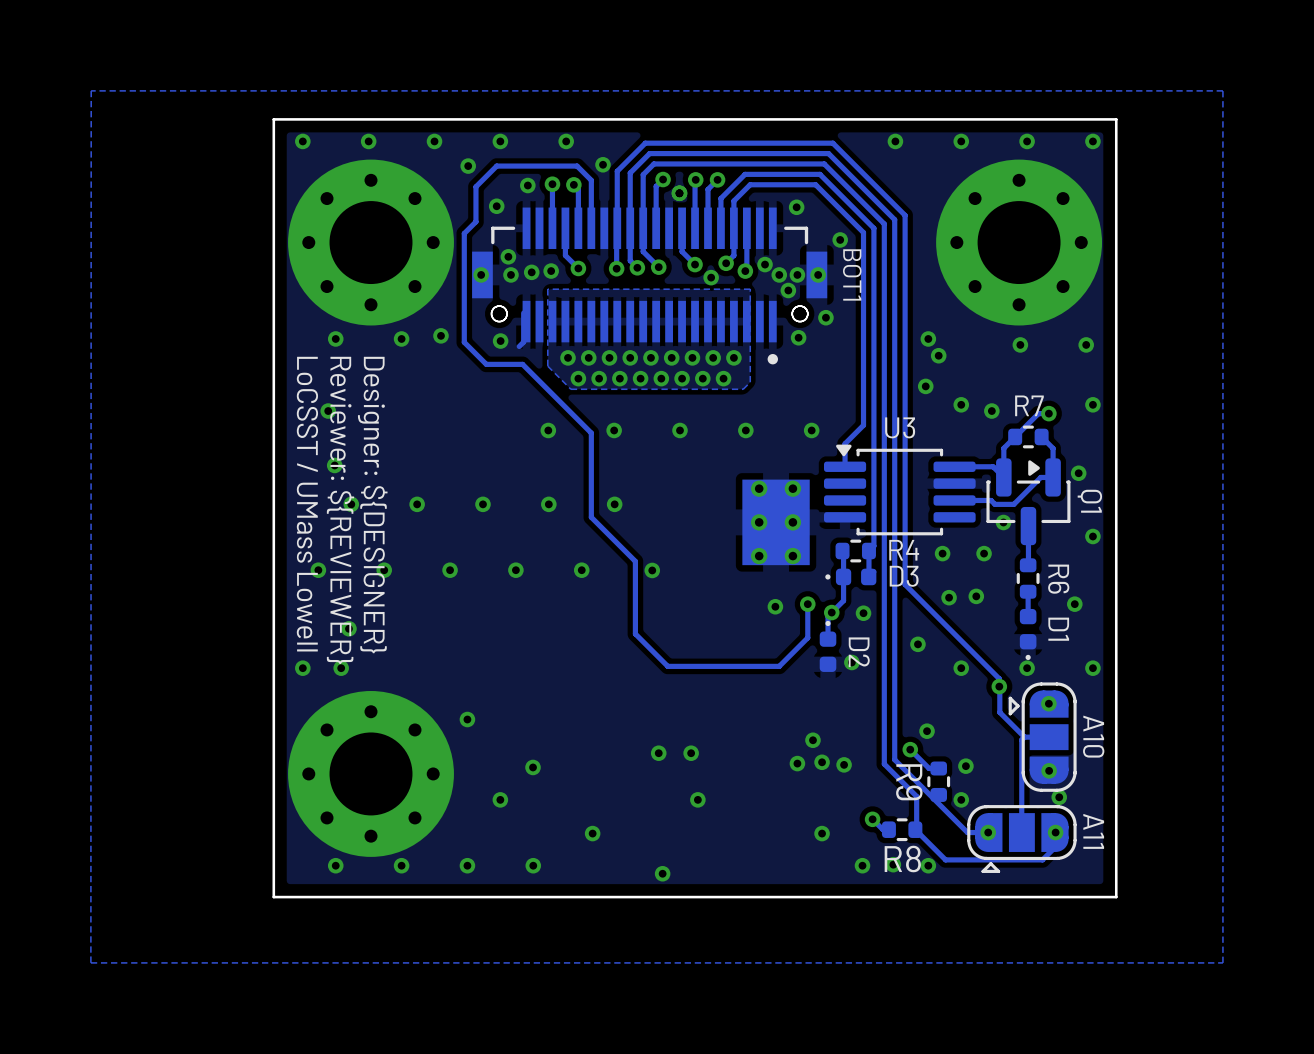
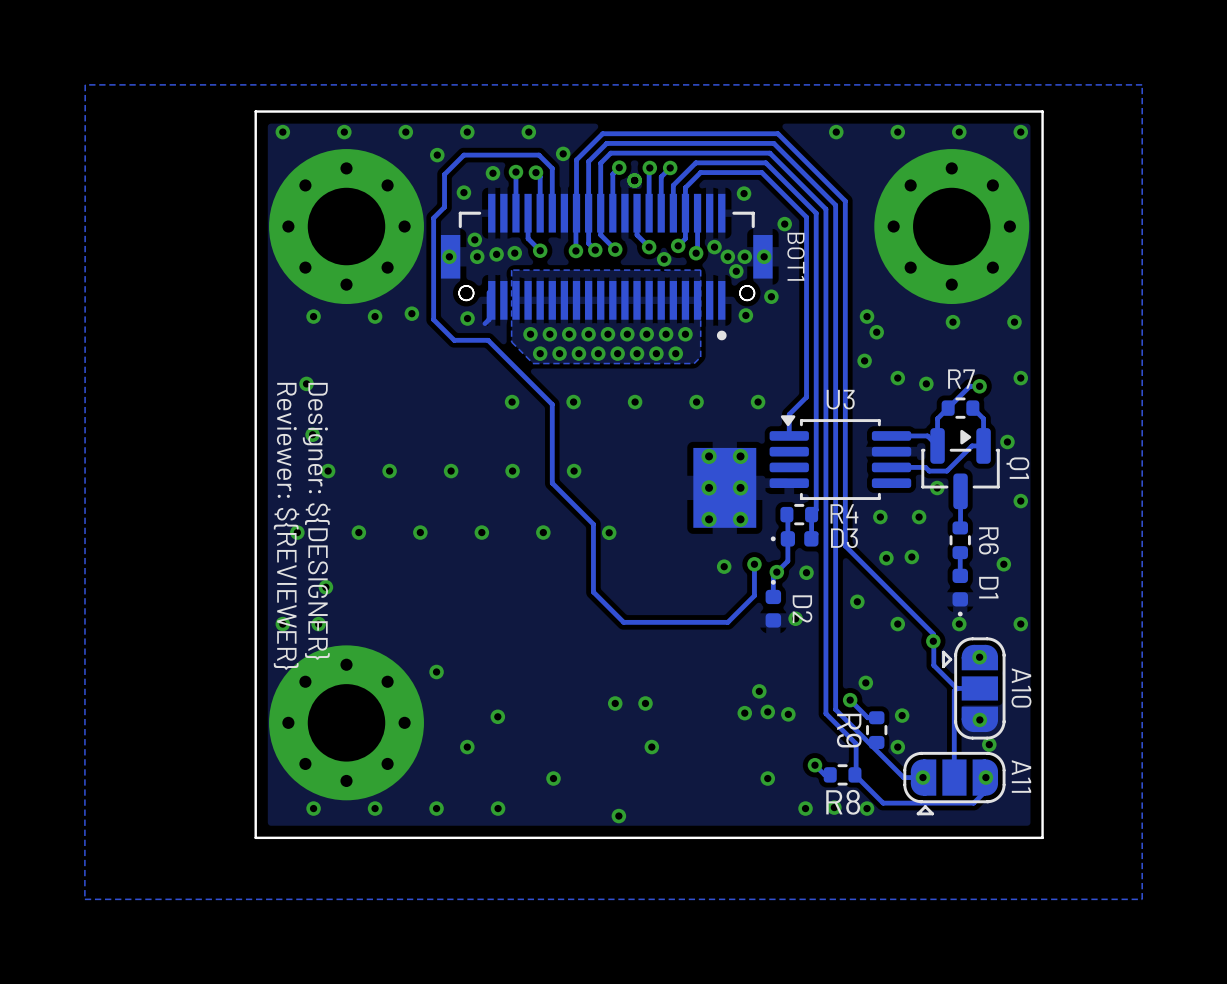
text: LoCSST / UMass Lowell (307, 504) -> none
text position: Designer: ${DESIGNER} (372, 505) -> Designer: ${DESIGNER} (316, 521)
text position: Reviewer: ${REVIEWER} (340, 510) -> Reviewer: ${REVIEWER} (286, 526)

